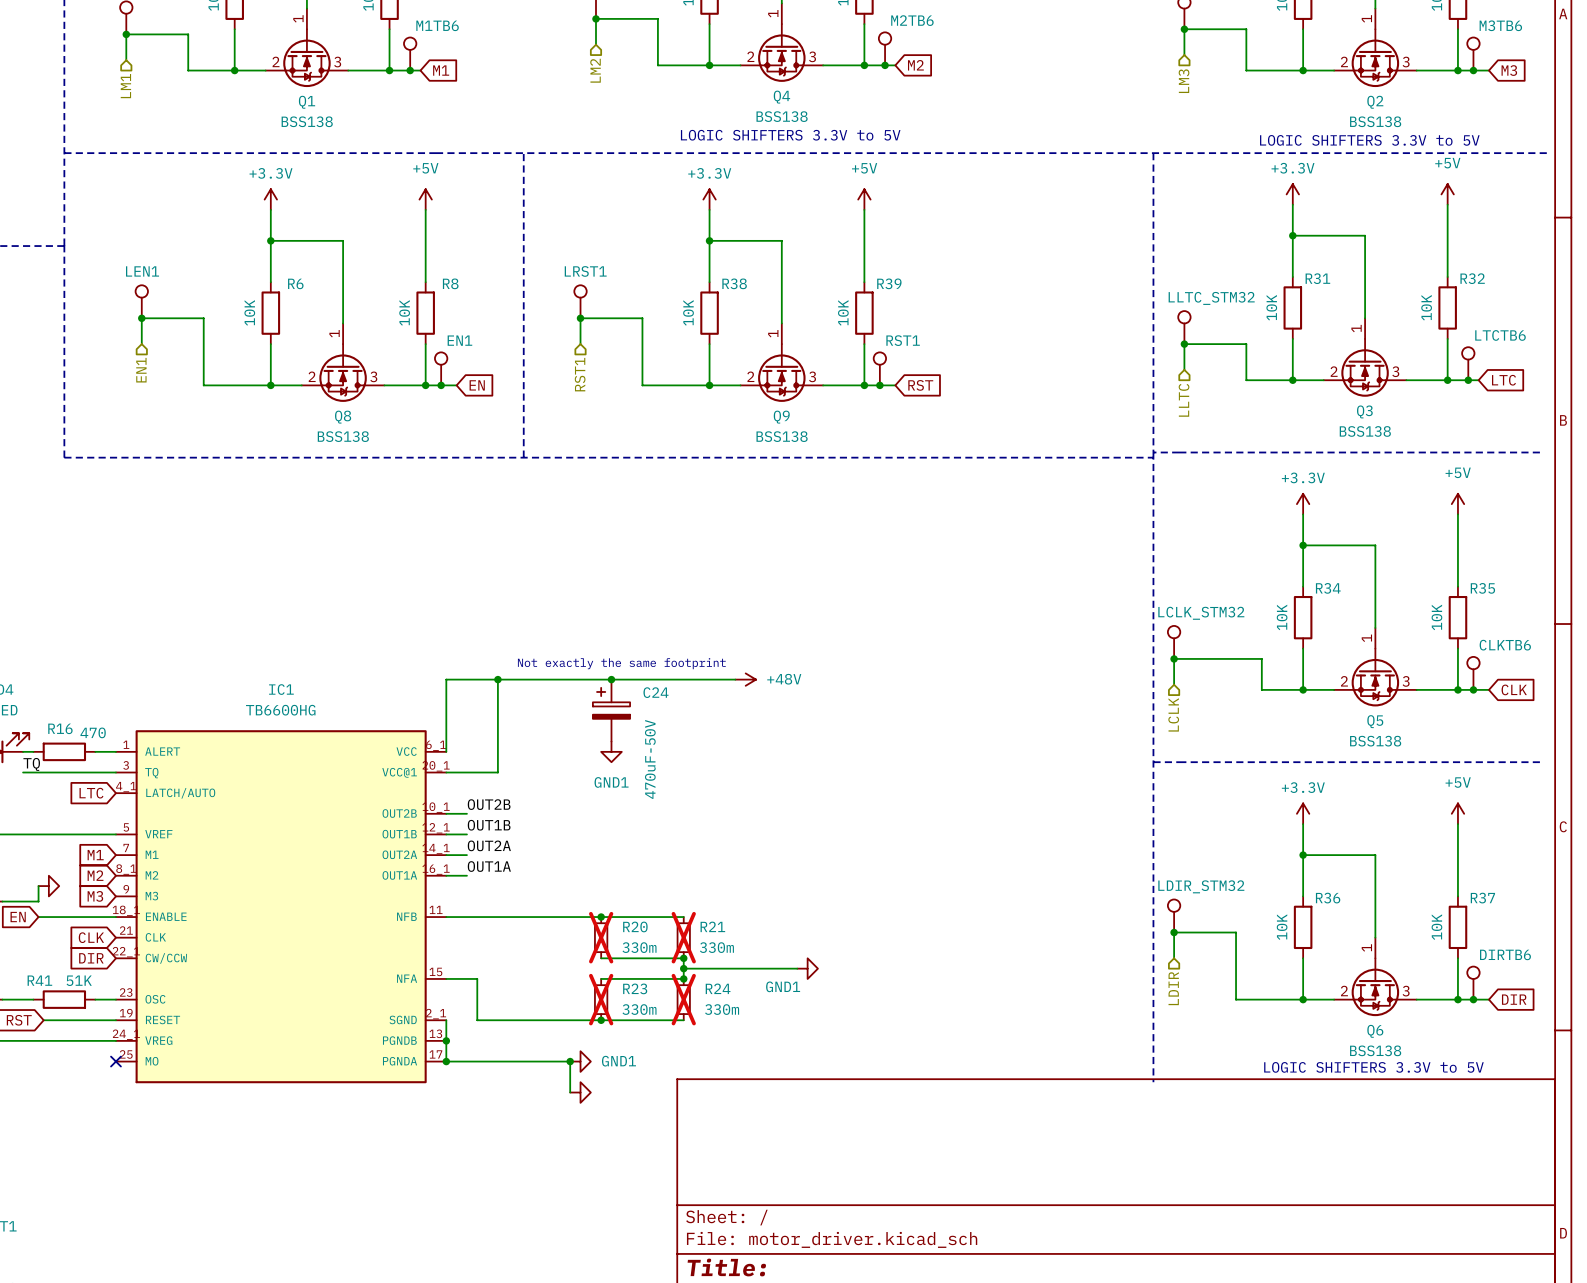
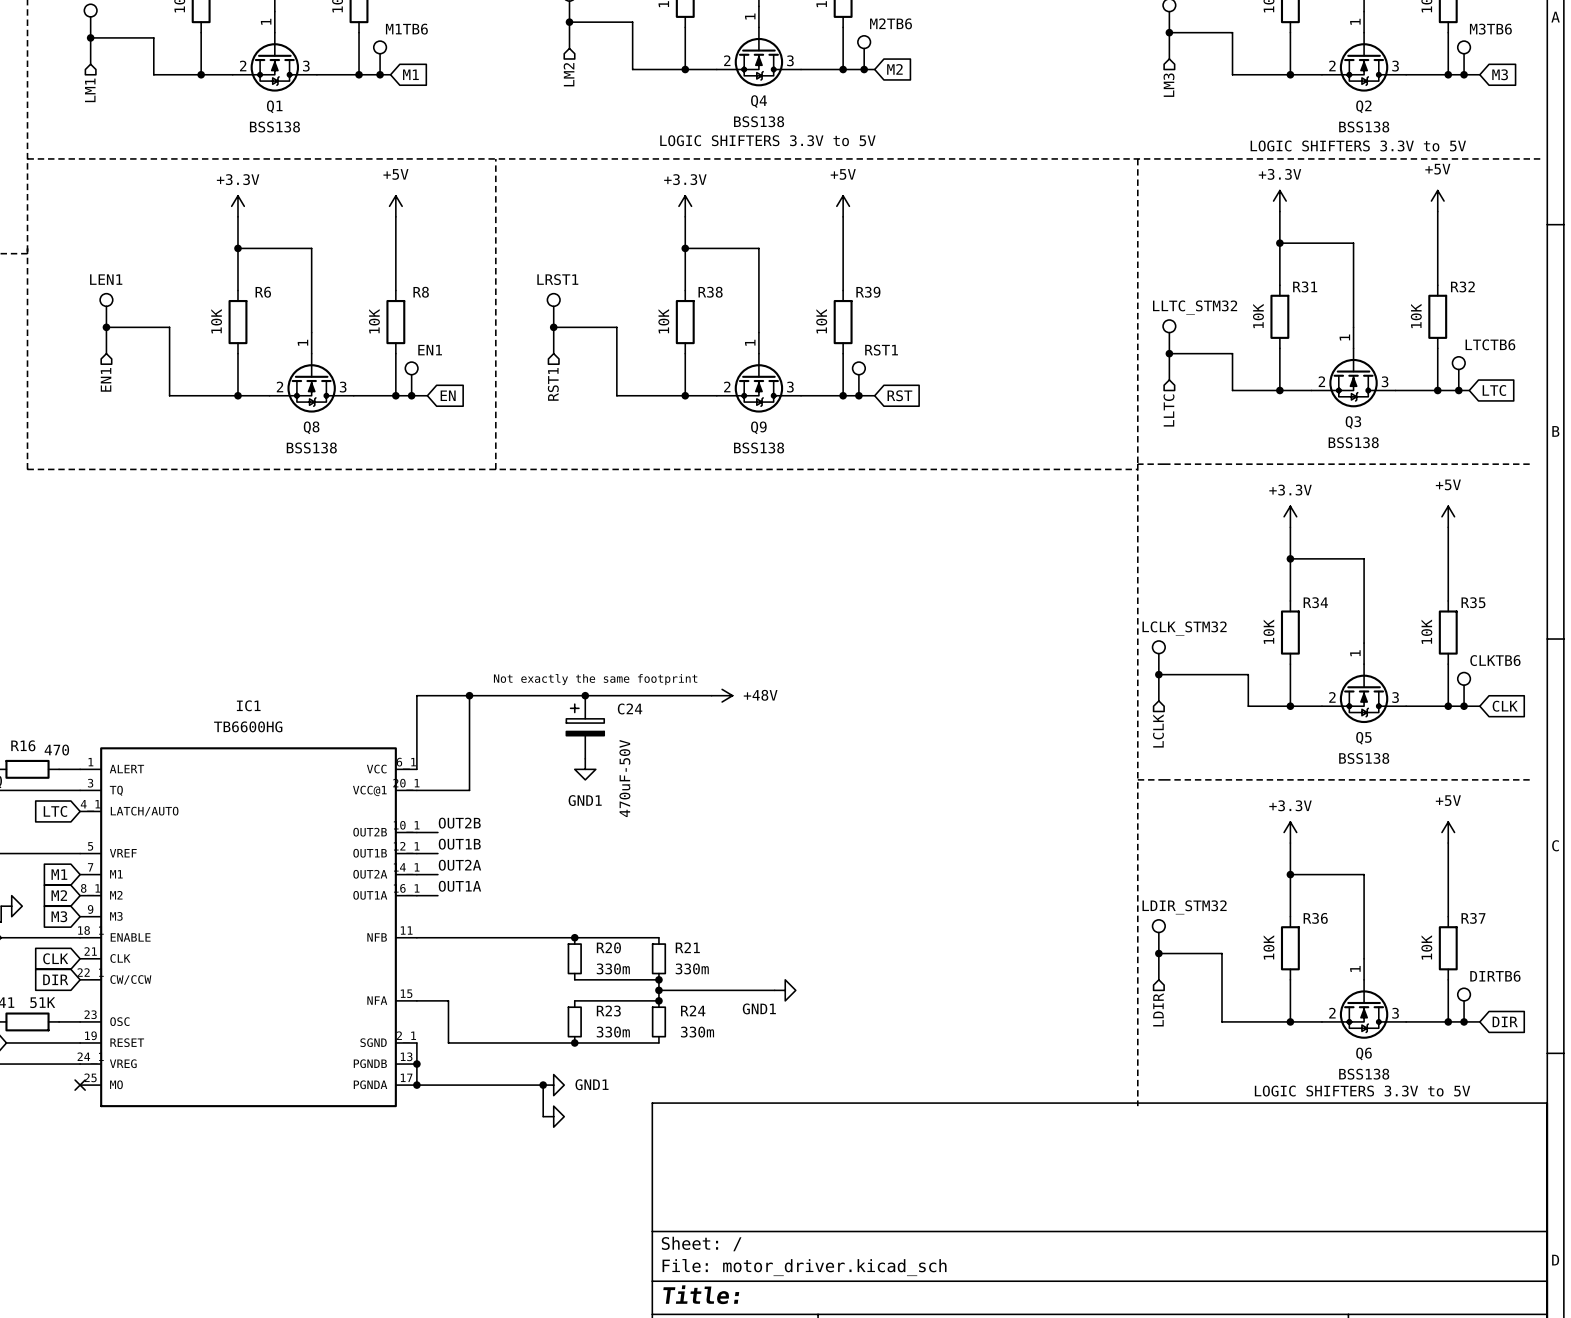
R20 do-not-place cross: (601, 937) -> none
R21 do-not-place cross: (683, 937) -> none
R23 do-not-place cross: (601, 999) -> none
R24 do-not-place cross: (683, 999) -> none

